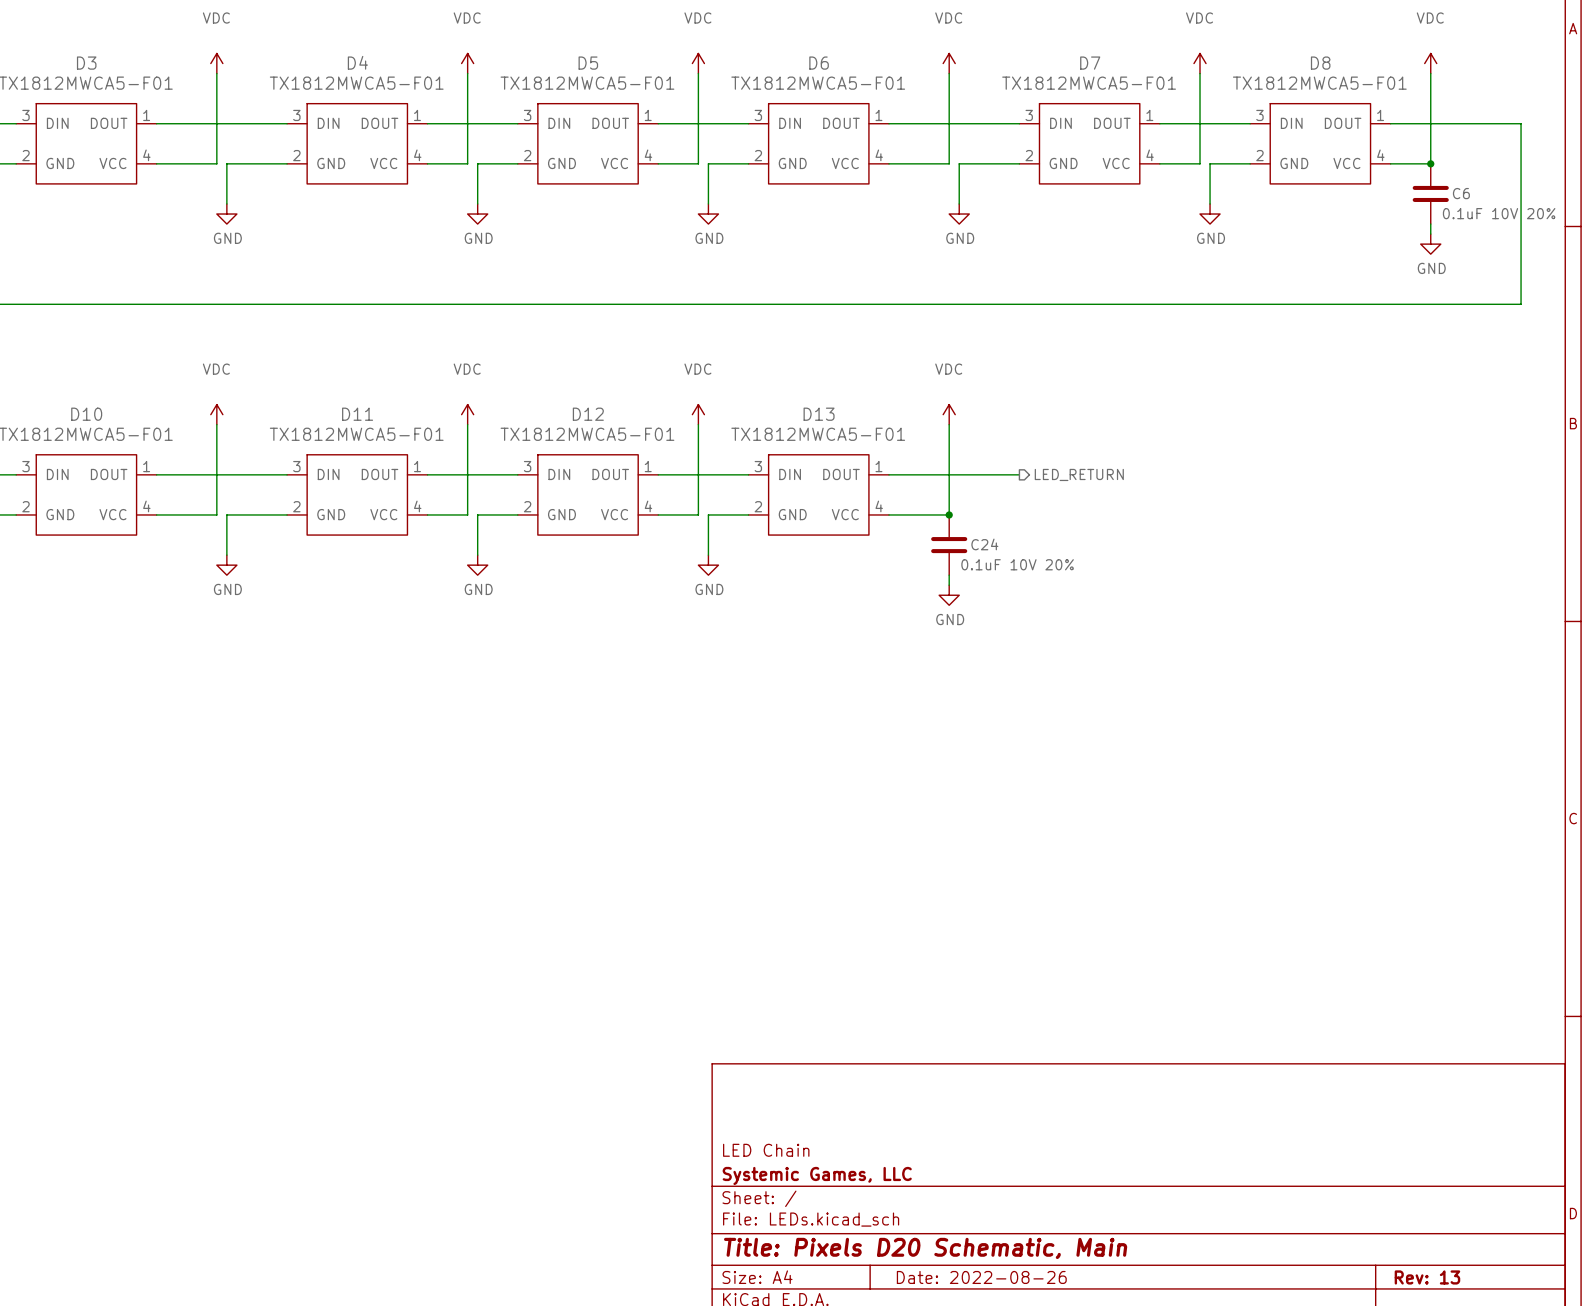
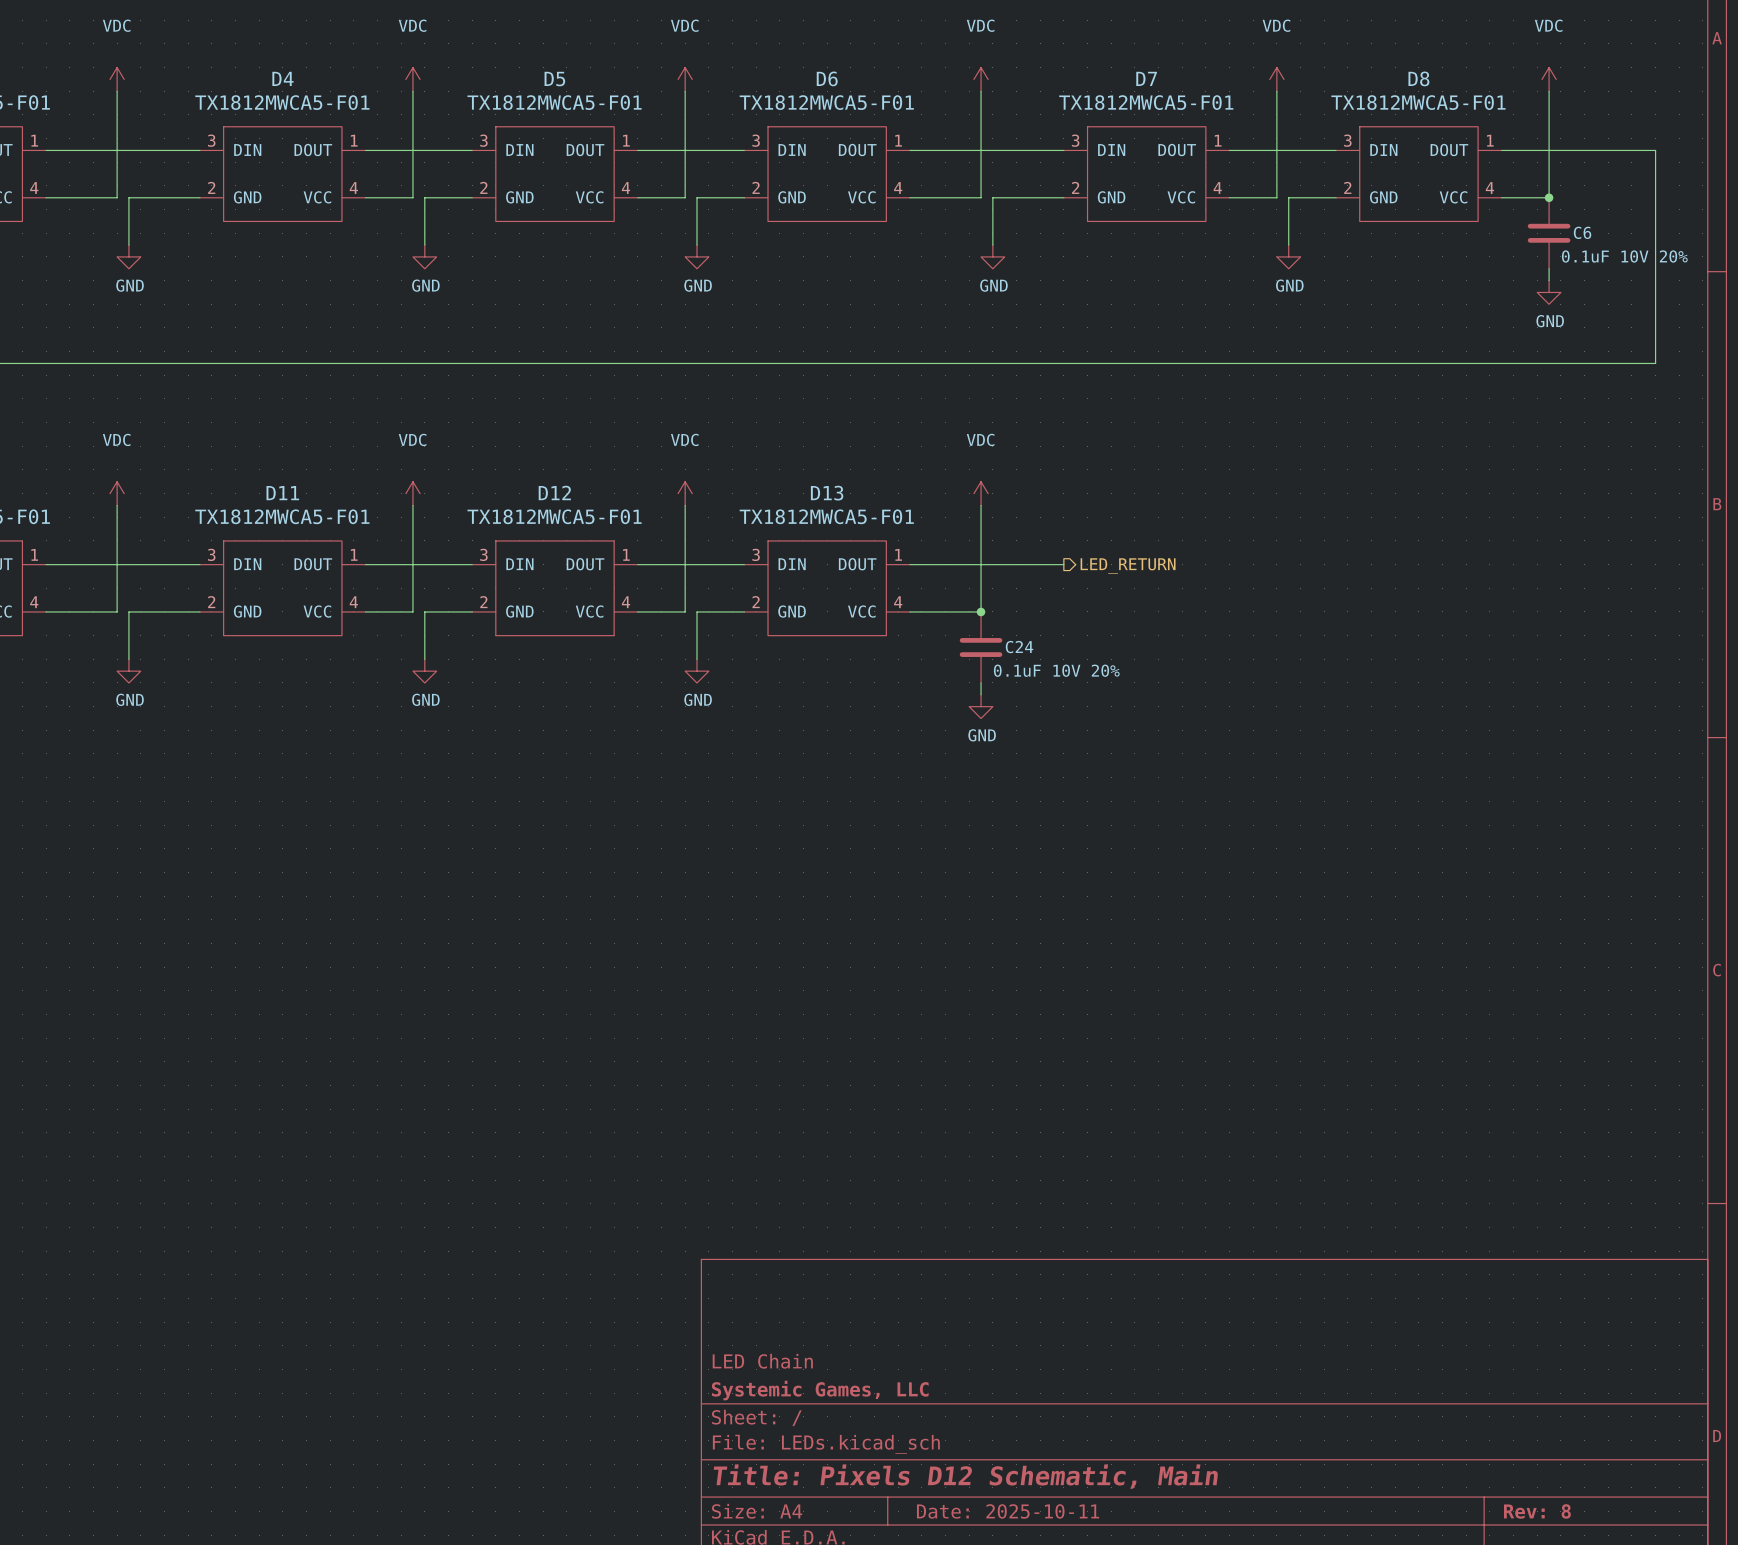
title block: Title: Pixels D20 Schematic, Main (925, 1248) -> Title: Pixels D12 Schematic, Main (965, 1476)
title block: Date: 2022-08-26 (981, 1277) -> Date: 2025-10-11 (1008, 1511)
title block: Rev: 13 (1427, 1277) -> Rev: 8 (1537, 1511)

